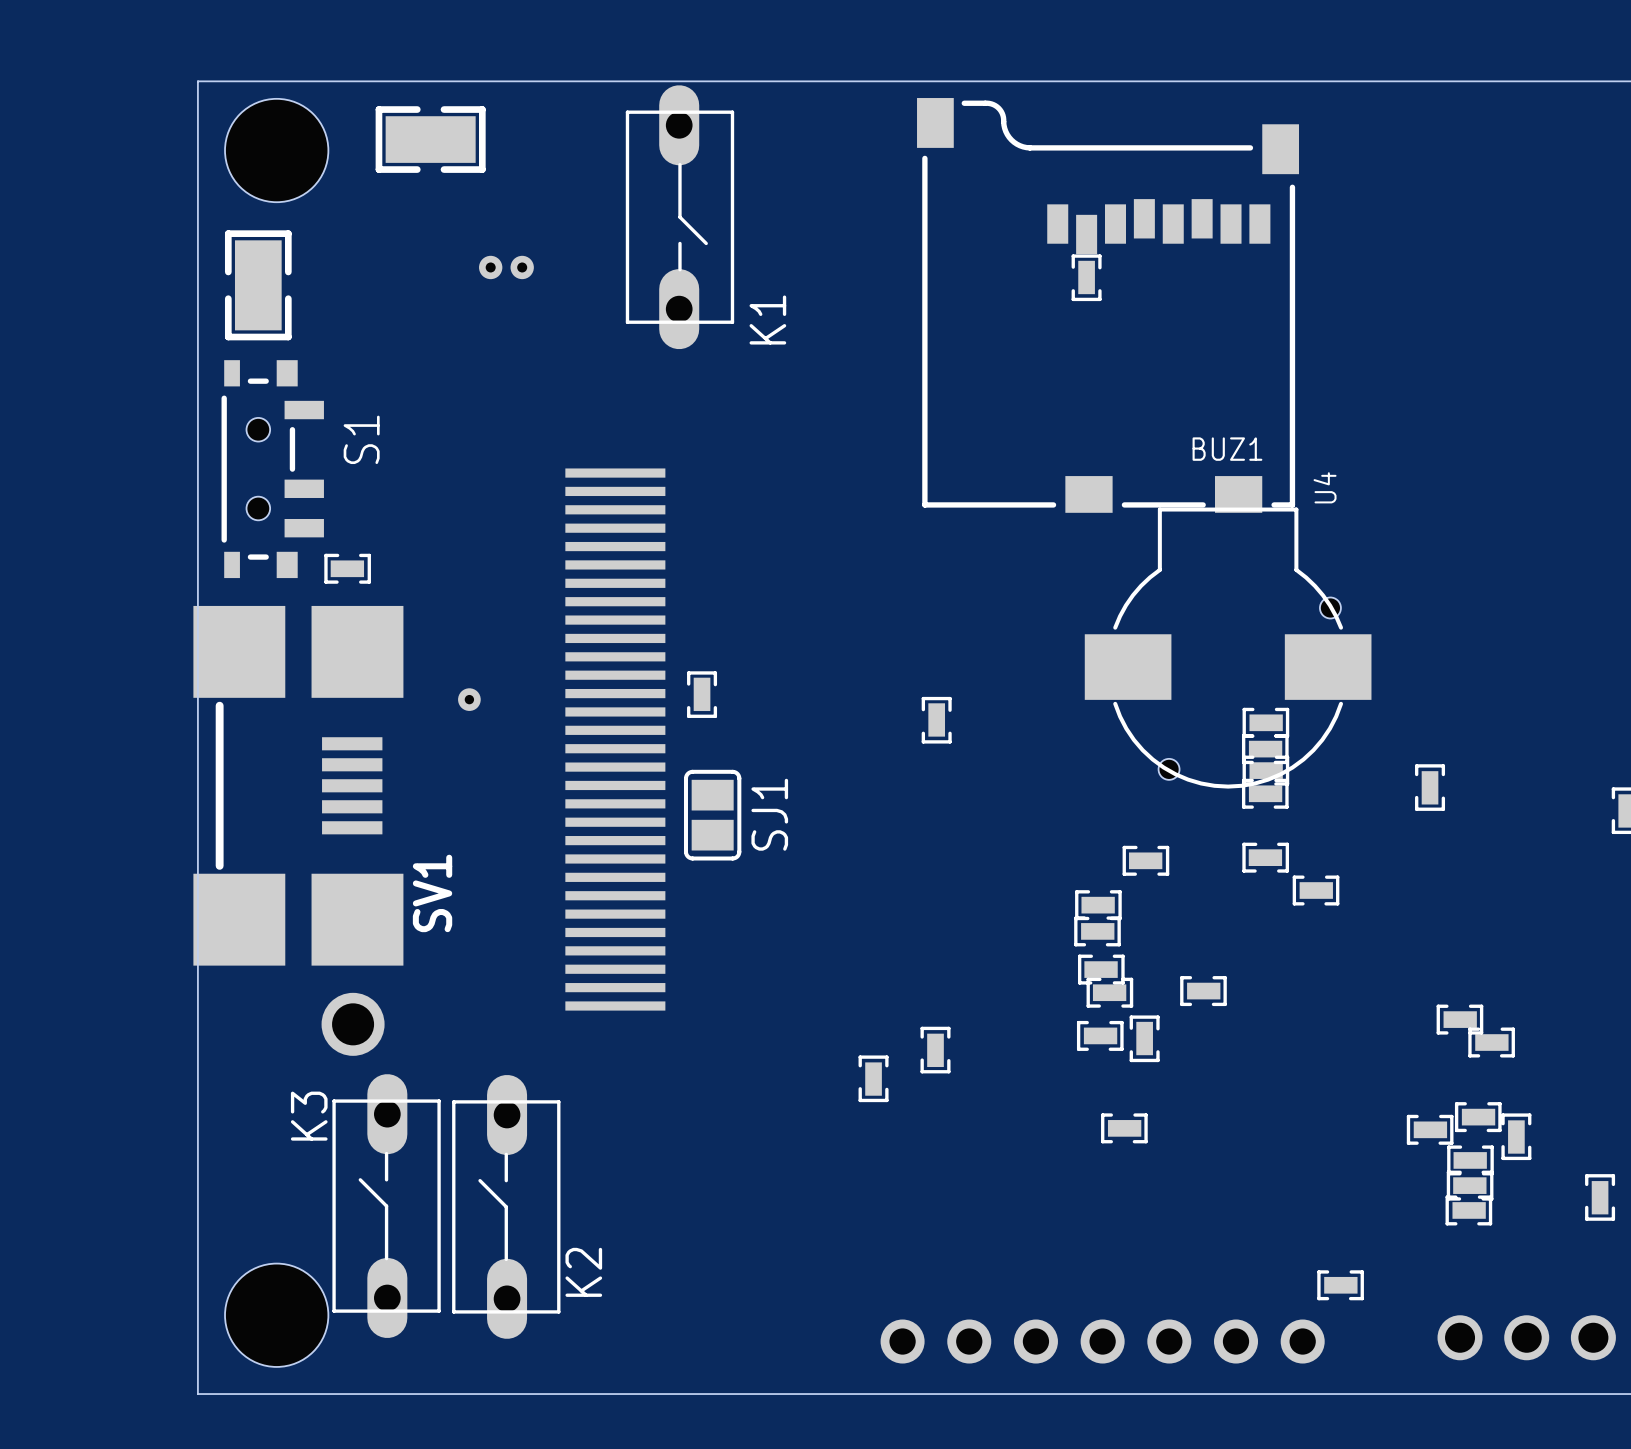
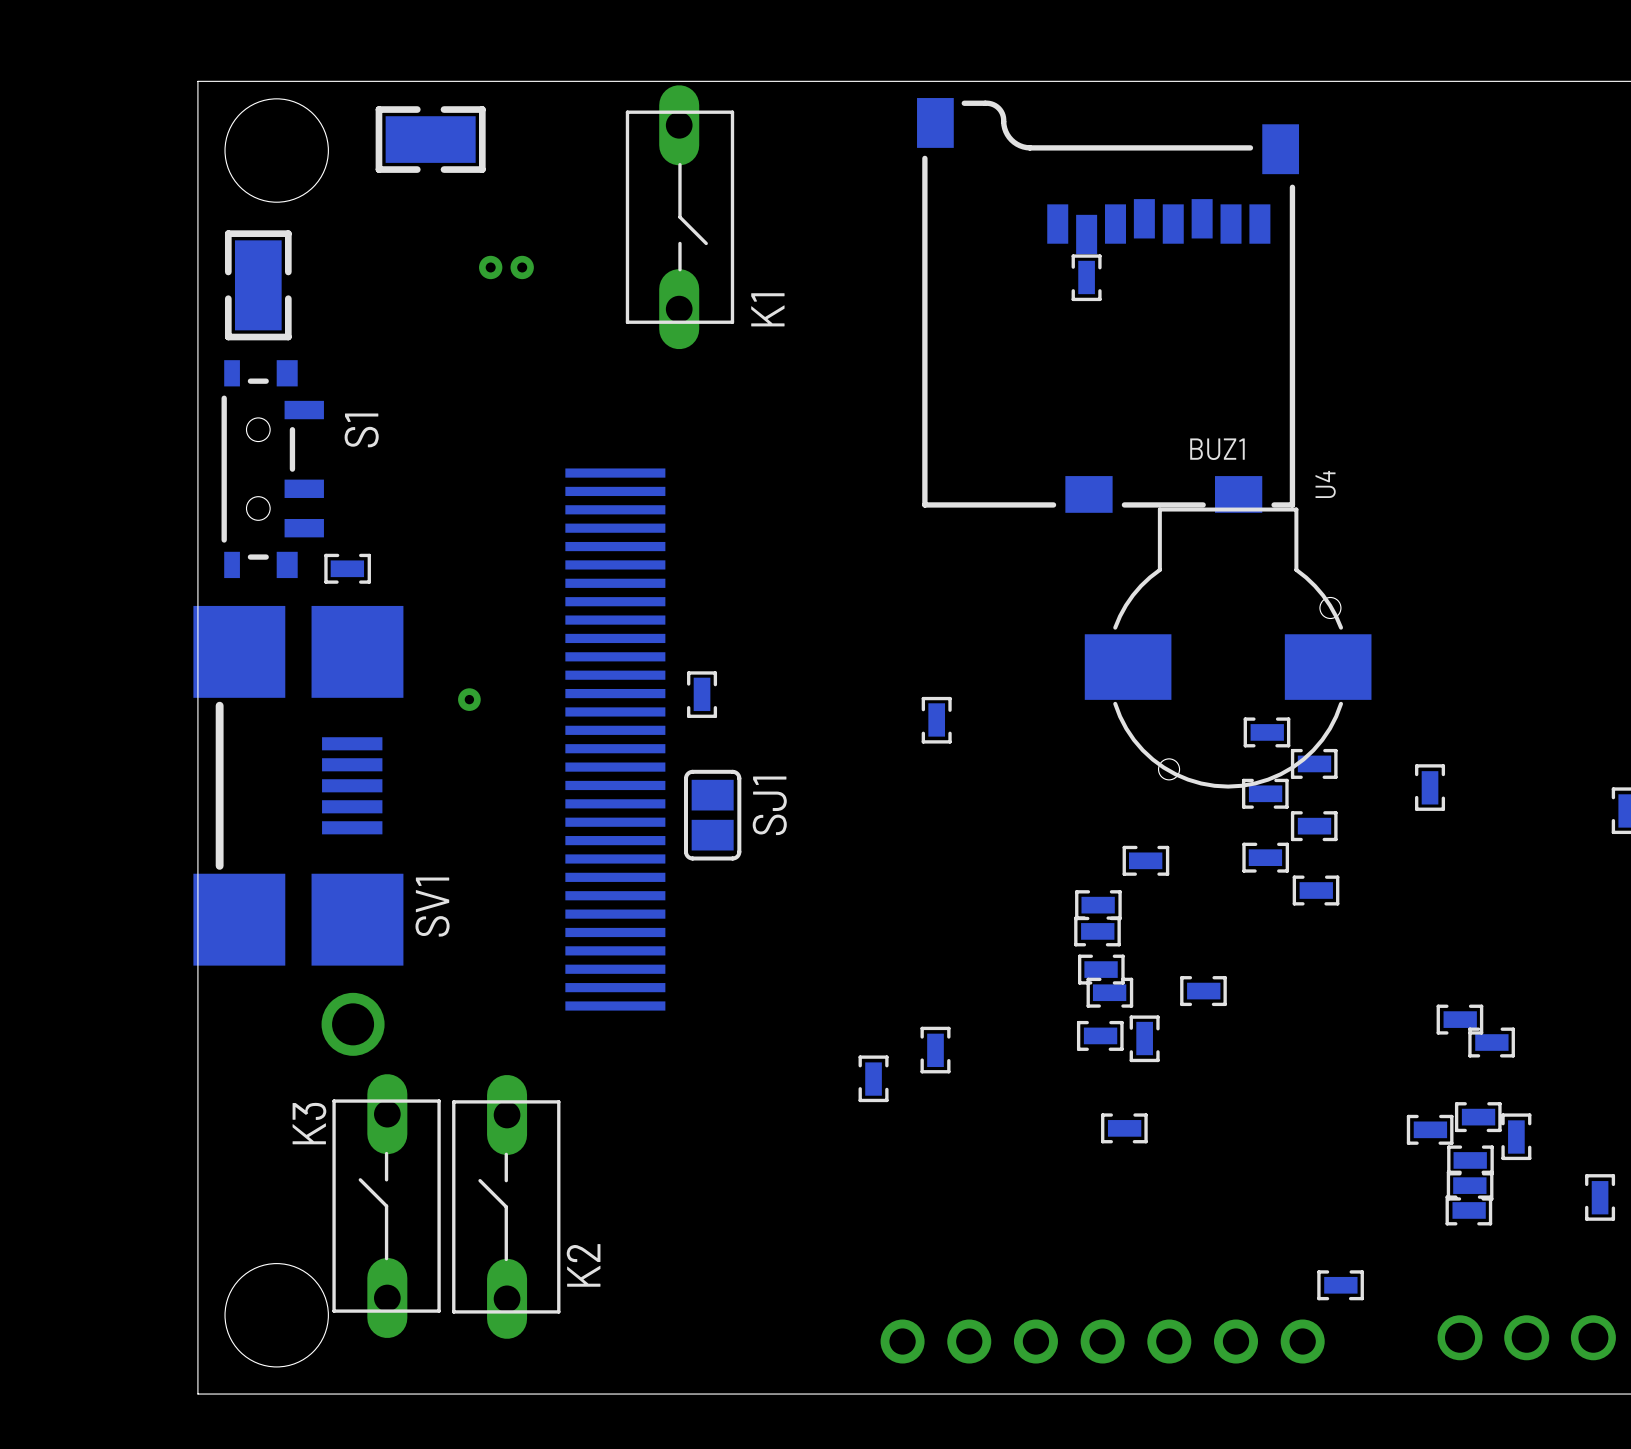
part: (1265, 722) -> none
part: none -> (1266, 732)
part: (1265, 749) -> none
part: none -> (1314, 763)
part: (1265, 770) -> none
part: none -> (1314, 826)

